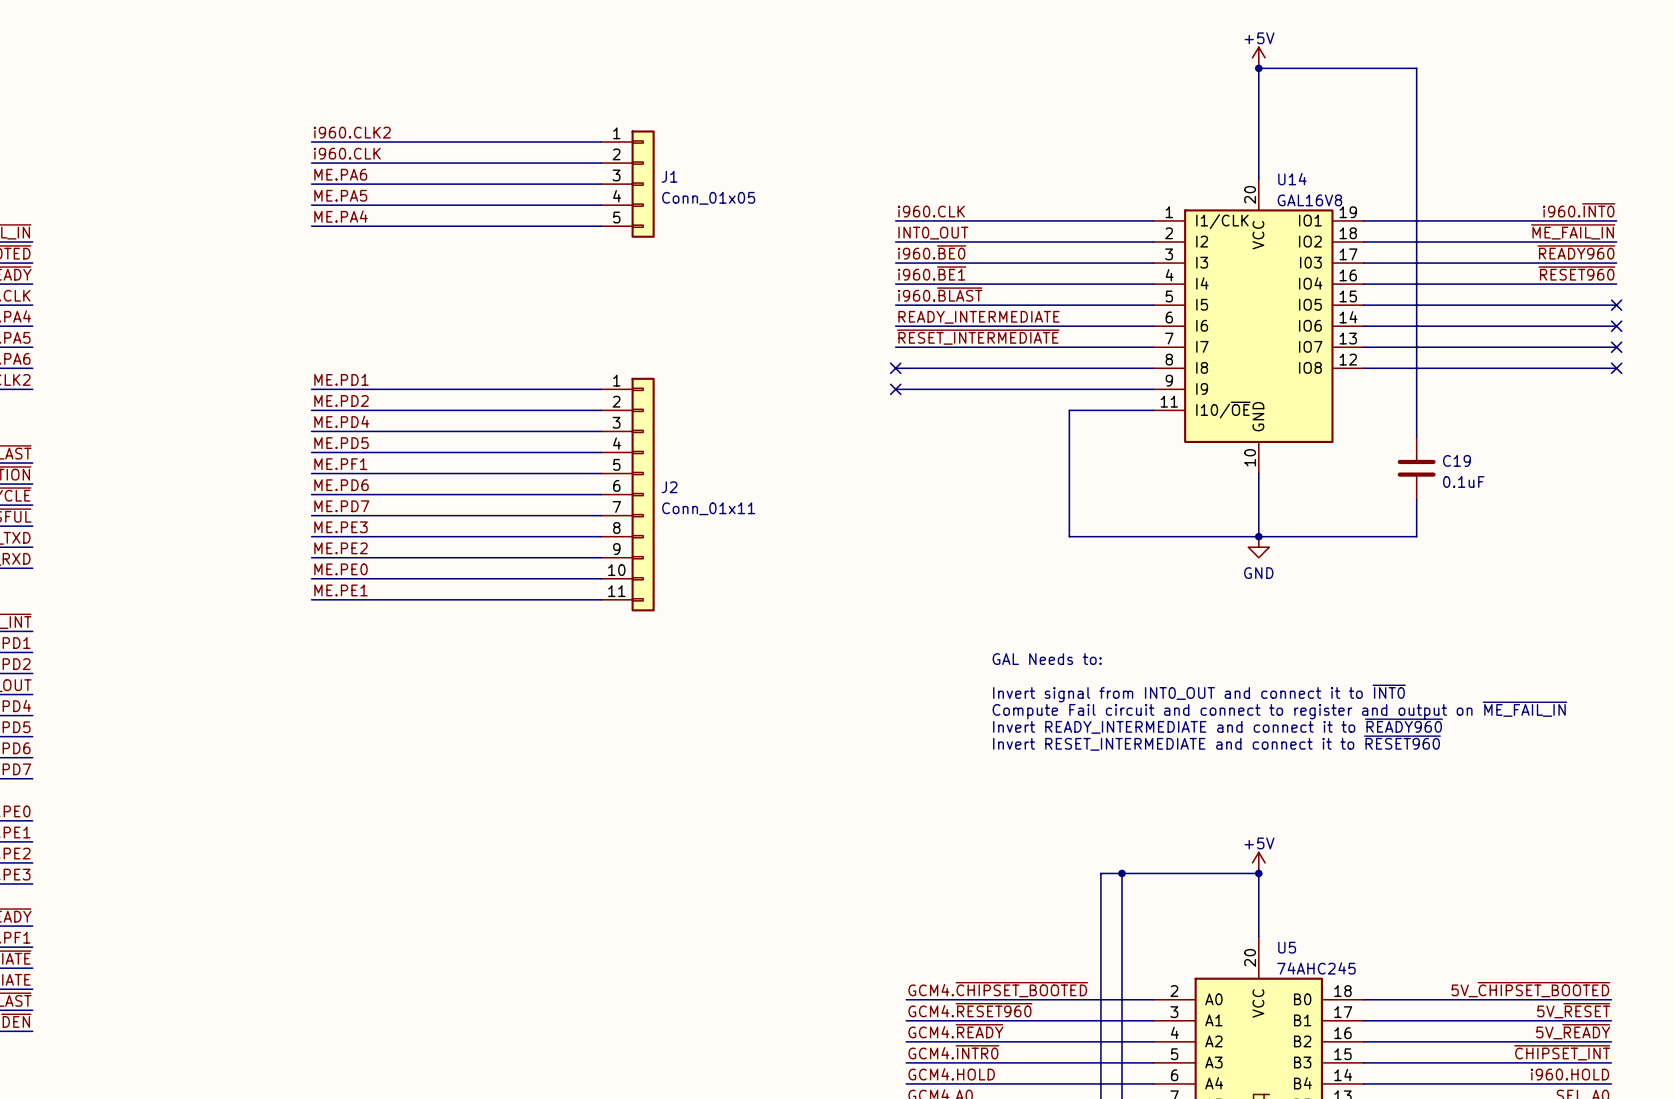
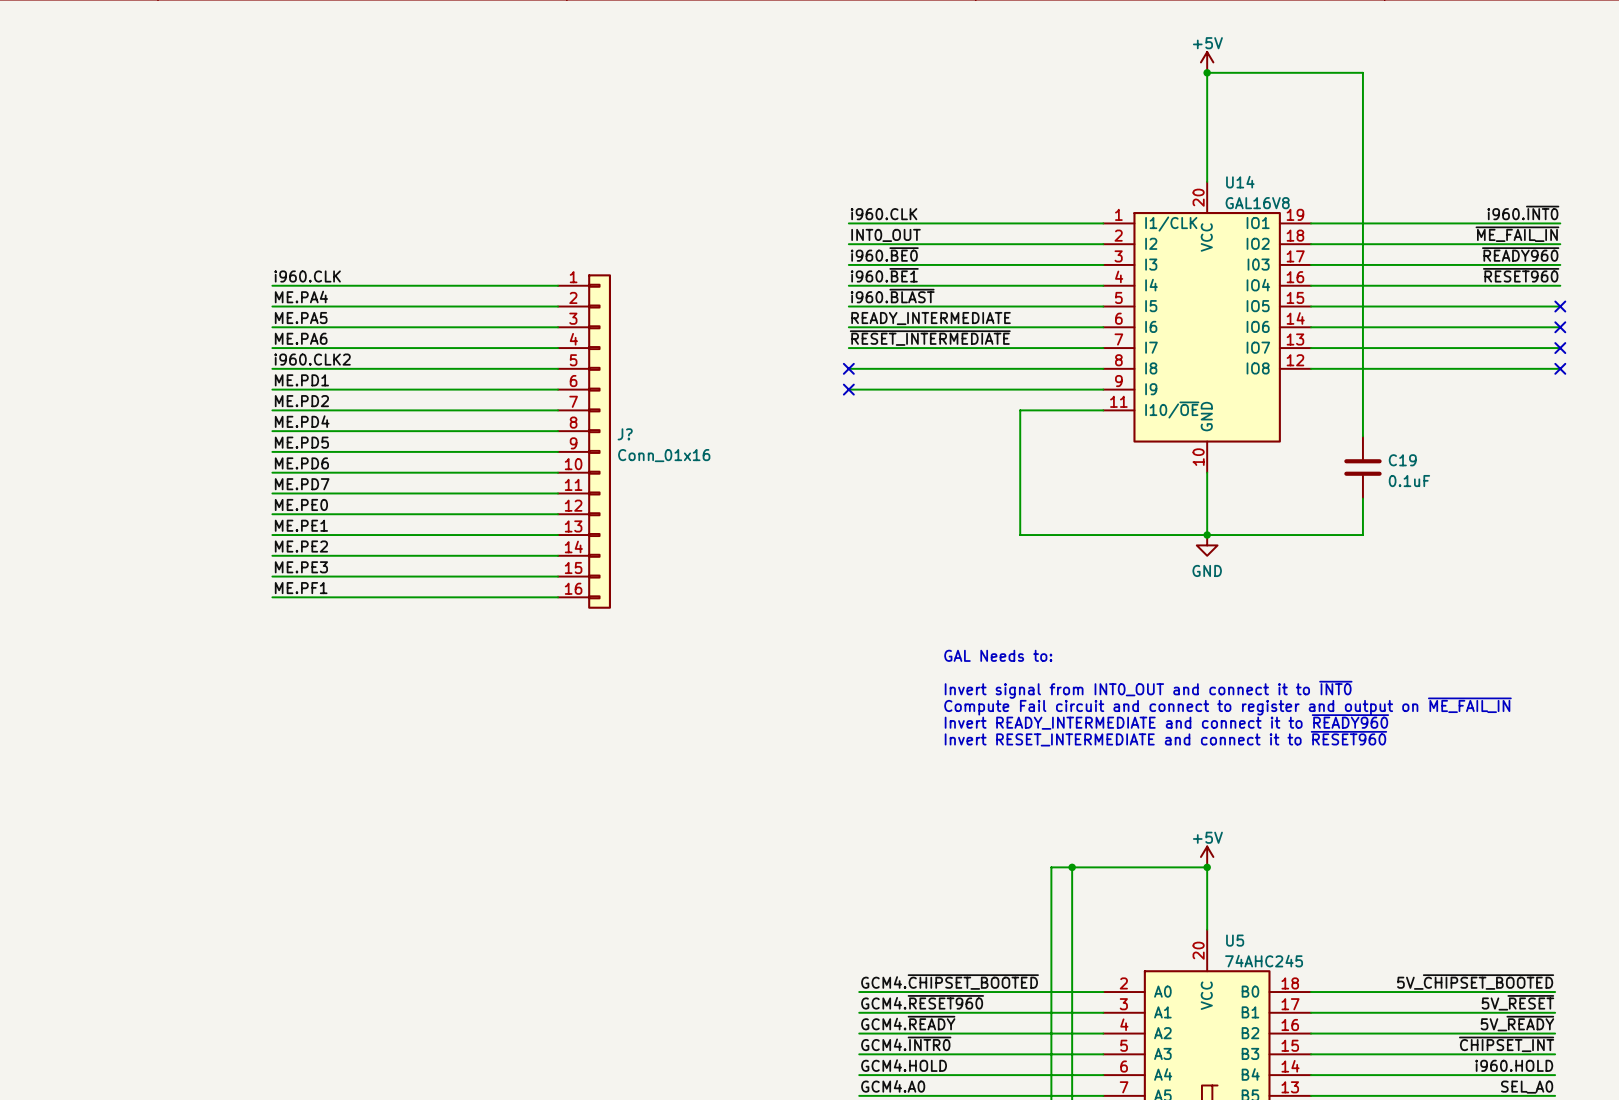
label: i960.CLK2 (352, 132) -> none
wire: (311, 142) (601, 142) -> (272, 285) (558, 285)
label position: i960.CLK (347, 153) -> i960.CLK (307, 276)
wire: (311, 163) (601, 163) -> (272, 306) (558, 306)
label position: ME.PA6 (340, 174) -> ME.PA6 (301, 338)
wire: (311, 184) (601, 184) -> (272, 327) (558, 327)
J1: Conn_01x05 (627, 184) -> none
label position: ME.PA5 (340, 195) -> ME.PA5 (301, 318)
wire: (311, 205) (601, 205) -> (272, 348) (558, 348)
label position: ME.PA4 (341, 216) -> ME.PA4 (301, 297)
wire: (311, 226) (601, 226) -> (272, 368) (558, 368)
label: none -> i960.CLK2 (312, 359)
J?: none -> Conn_01x16 (584, 441)
label: ME.PF1 (340, 464) -> ME.PD6 (301, 463)
label: ME.PD6 (341, 485) -> ME.PD7 (302, 484)
J2: Conn_01x11 (627, 494) -> none
label: ME.PD7 (341, 506) -> ME.PE0 (301, 504)
label: ME.PE3 (341, 527) -> ME.PE1 (301, 525)
label: ME.PE0 (341, 569) -> ME.PE3 (301, 567)
label: ME.PE1 (341, 590) -> ME.PF1 (301, 588)

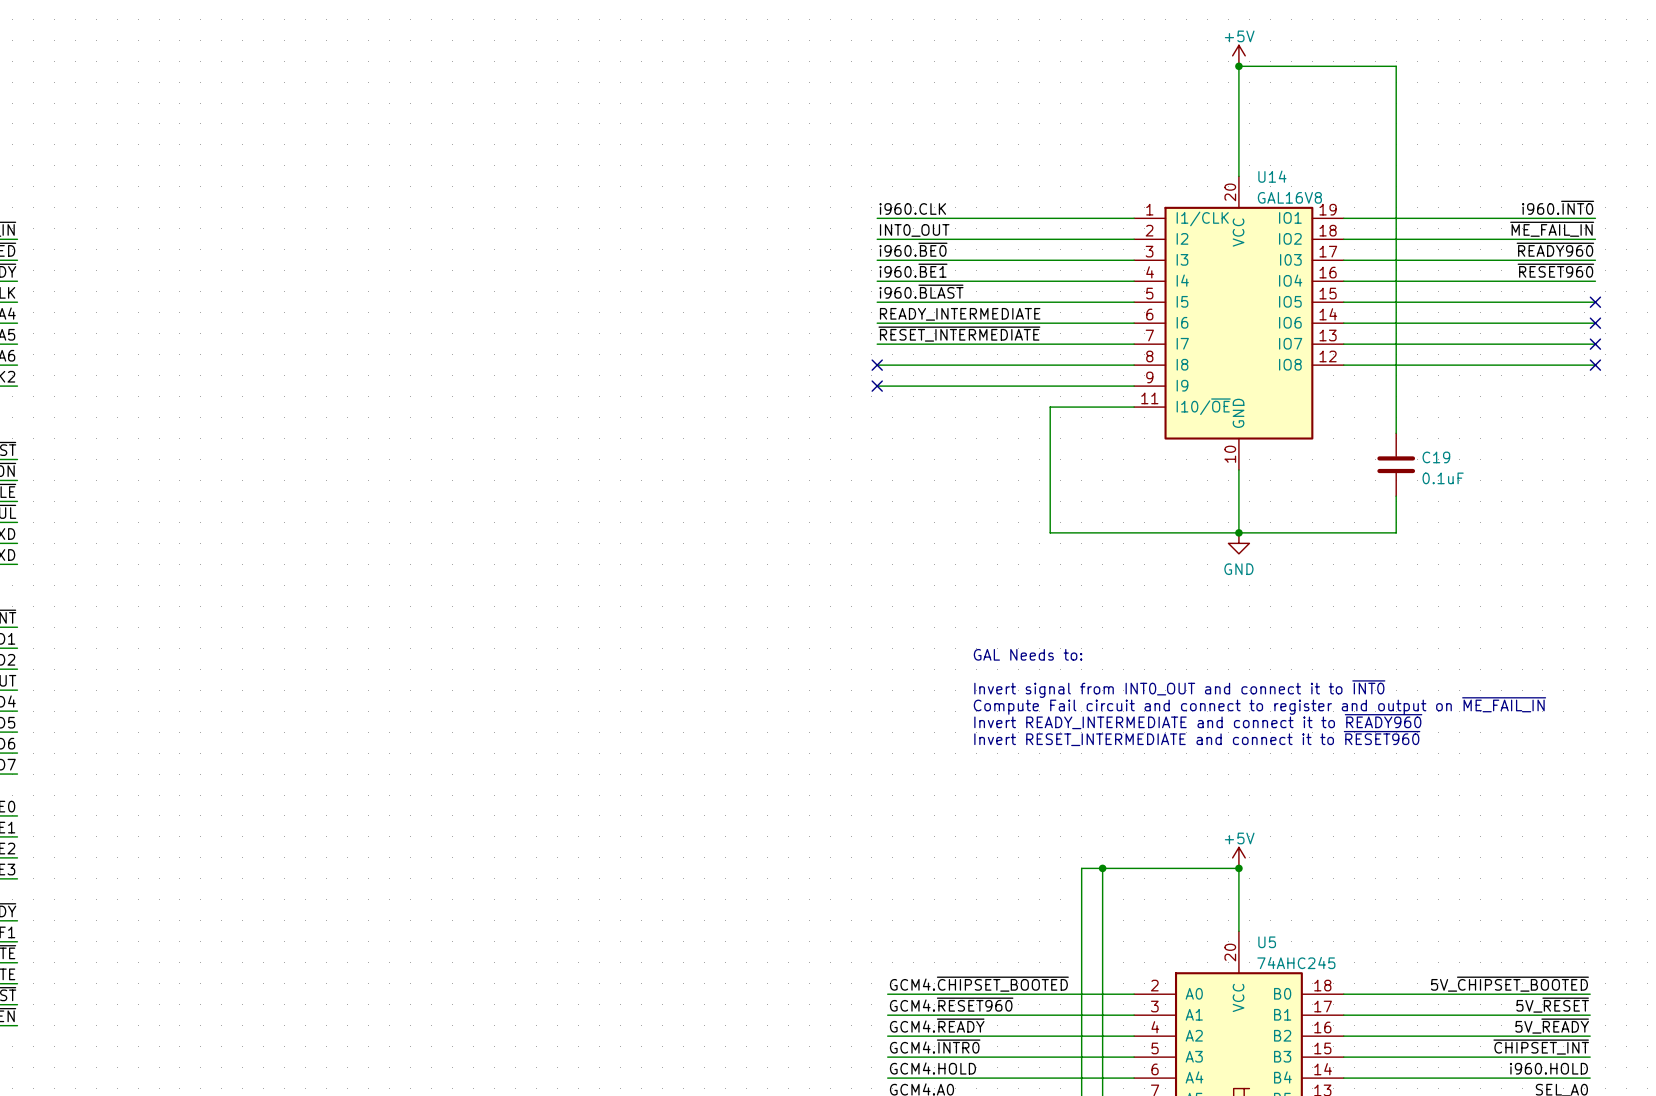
label: i960.CLK (307, 276) -> none
wire: (272, 285) (558, 285) -> none
label: ME.PA4 (301, 297) -> none
wire: (272, 306) (558, 306) -> none
label: ME.PA5 (301, 318) -> none
wire: (272, 327) (558, 327) -> none
label: ME.PA6 (301, 338) -> none
wire: (272, 348) (558, 348) -> none
label: i960.CLK2 (312, 359) -> none
wire: (272, 368) (558, 368) -> none
label: ME.PD1 (301, 380) -> none
wire: (272, 389) (558, 389) -> none
label: ME.PD2 (301, 401) -> none
wire: (272, 410) (558, 410) -> none
label: ME.PD4 (302, 421) -> none
wire: (272, 431) (558, 431) -> none
J?: Conn_01x16 (584, 441) -> none
label: ME.PD5 (301, 442) -> none
wire: (272, 451) (558, 451) -> none
label: ME.PD6 (301, 463) -> none
wire: (272, 472) (558, 472) -> none
label: ME.PD7 (302, 484) -> none
wire: (272, 493) (558, 493) -> none
label: ME.PE0 (301, 504) -> none
wire: (272, 514) (558, 514) -> none
label: ME.PE1 (301, 525) -> none
wire: (272, 535) (558, 535) -> none
label: ME.PE2 (301, 546) -> none
wire: (272, 555) (558, 555) -> none
label: ME.PE3 (301, 567) -> none
wire: (272, 576) (558, 576) -> none
label: ME.PF1 (301, 588) -> none
wire: (272, 597) (558, 597) -> none

